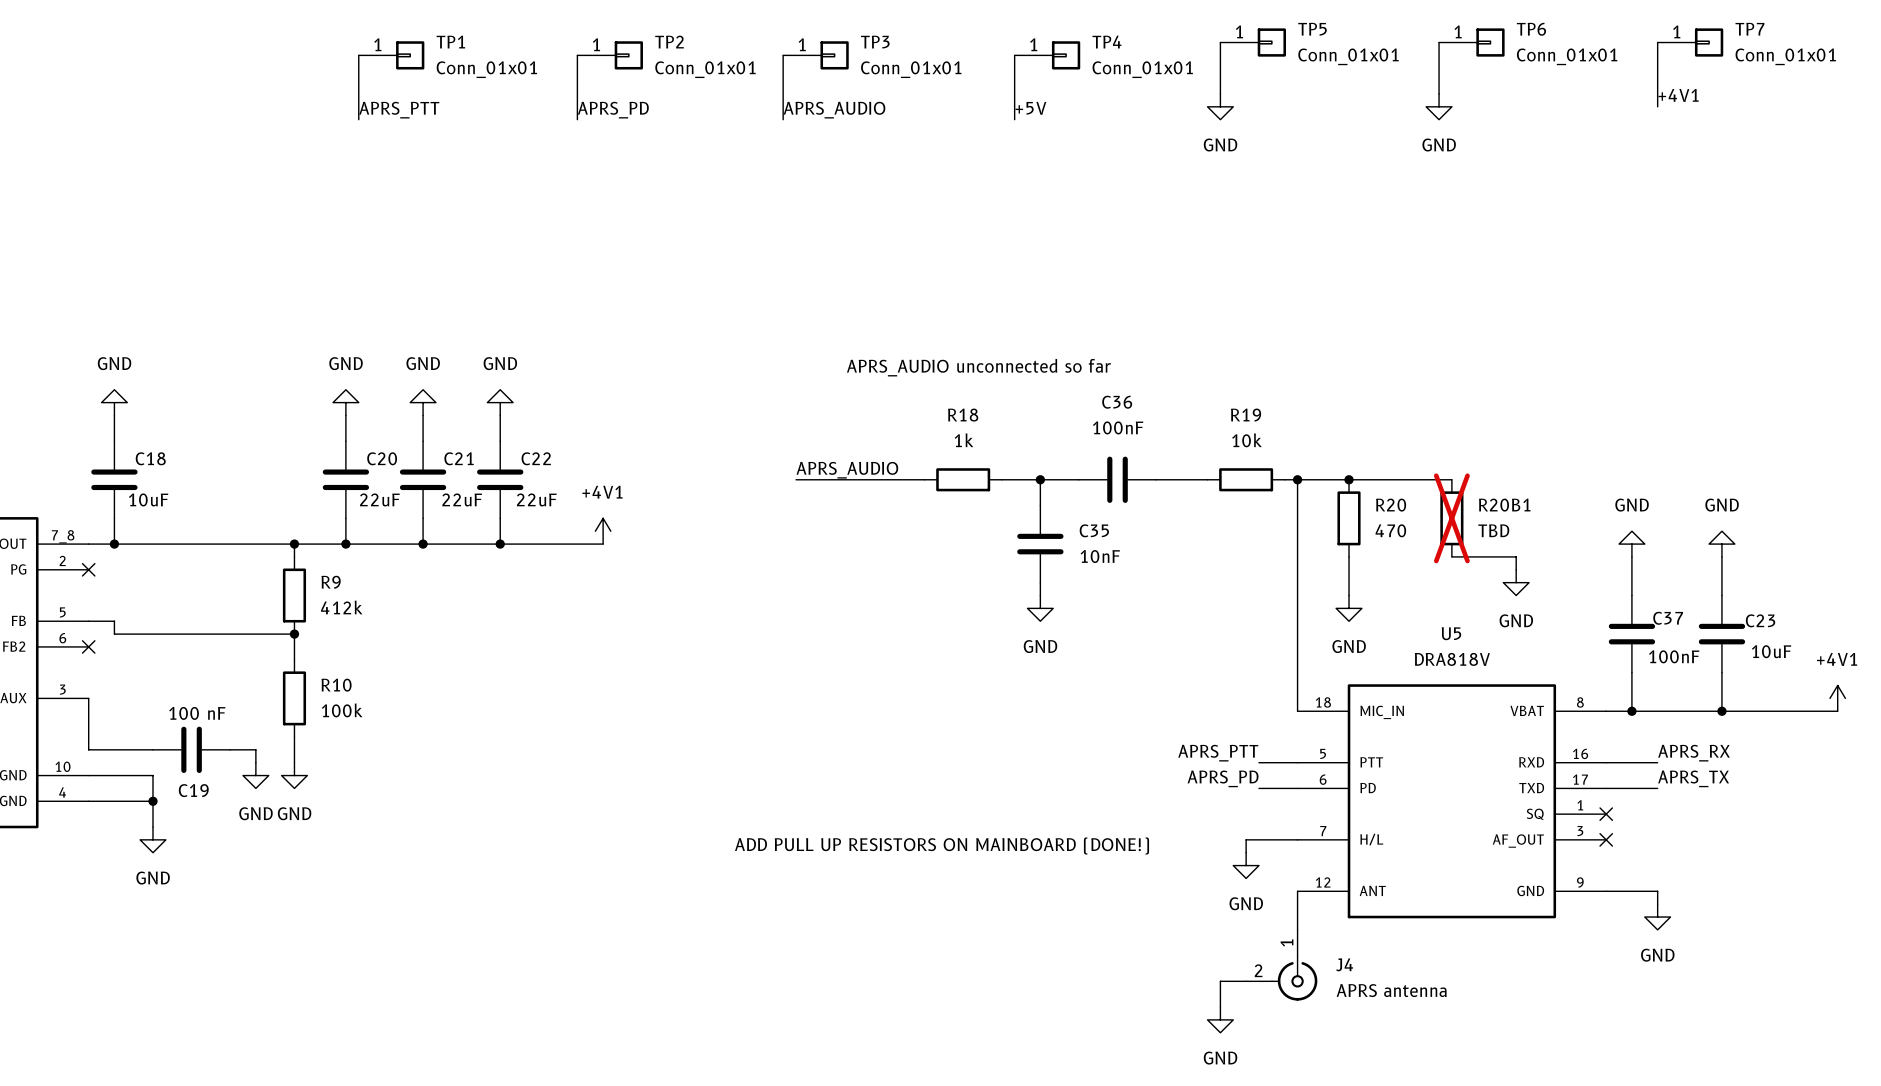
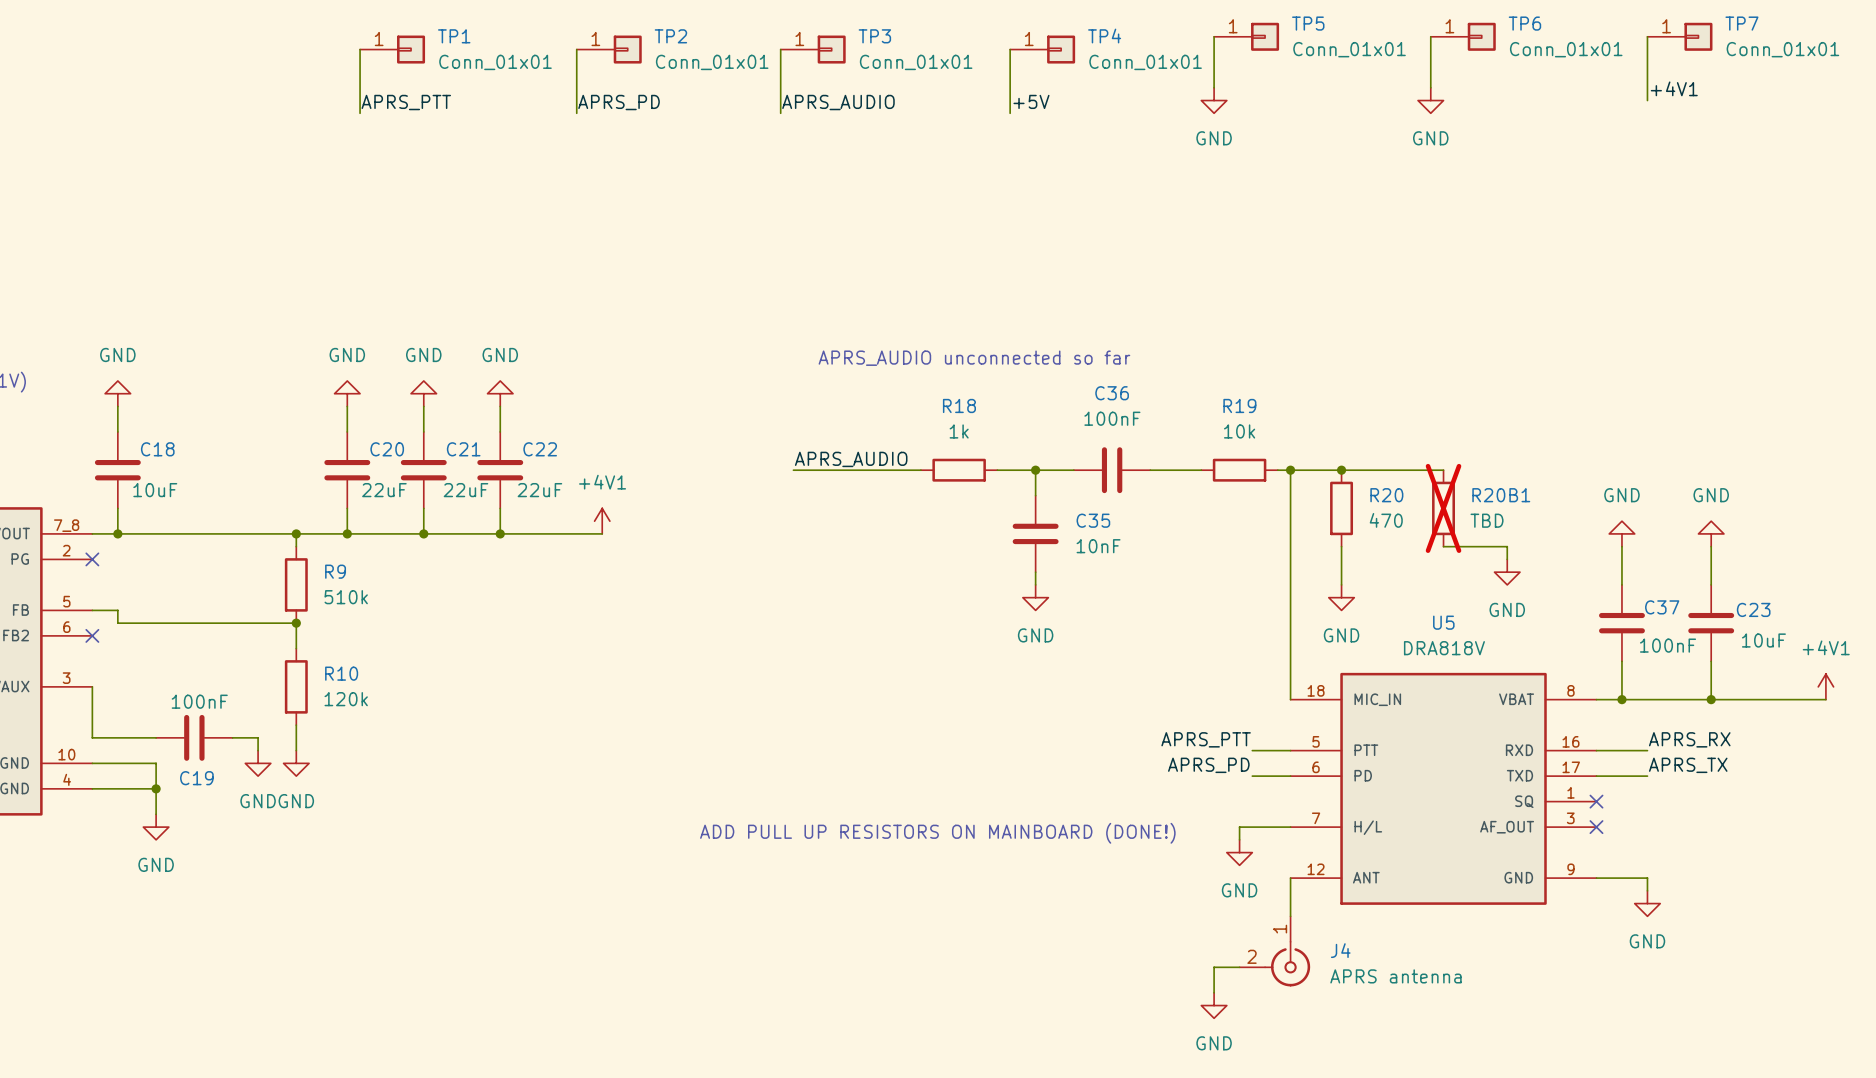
R9 value: 412k (341, 607) -> 510k (346, 597)
R10 value: 100k (342, 710) -> 120k (346, 699)
C19 value: 100 nF (197, 713) -> 100nF (199, 701)

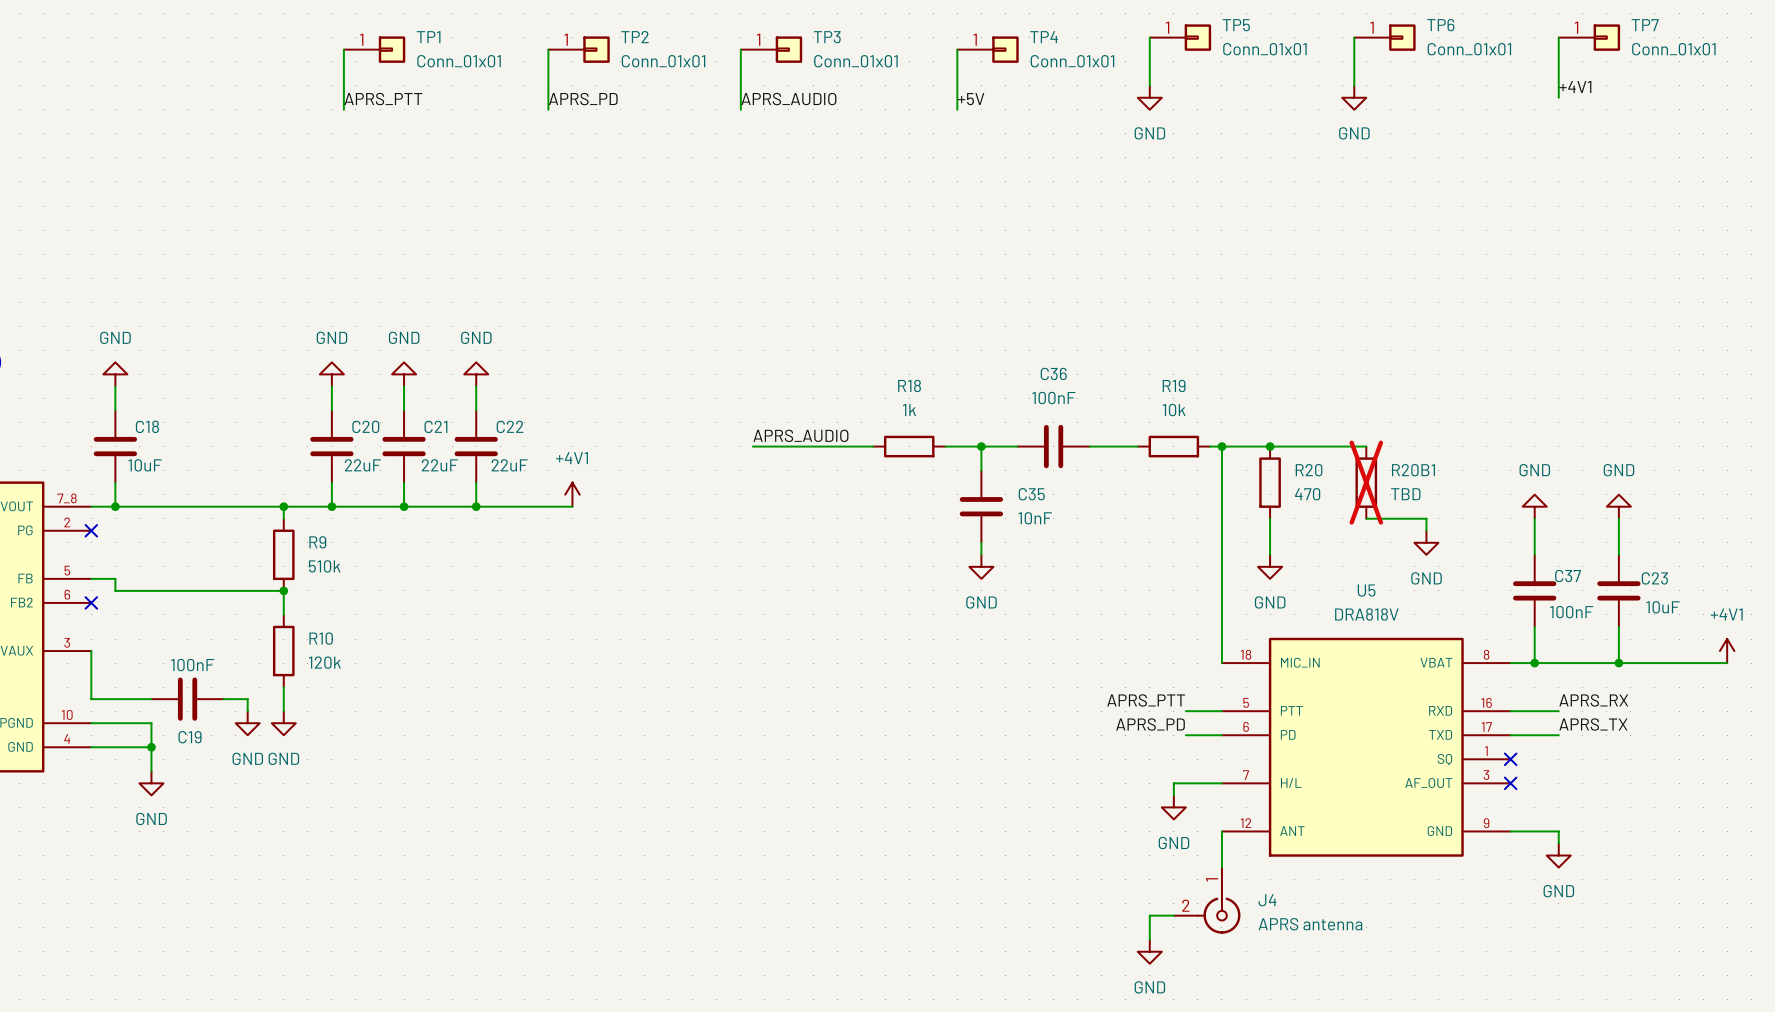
text: APRS_AUDIO unconnected so far (974, 358) -> none
text: ADD PULL UP RESISTORS ON MAINBOARD (DONE!) (937, 833) -> none

